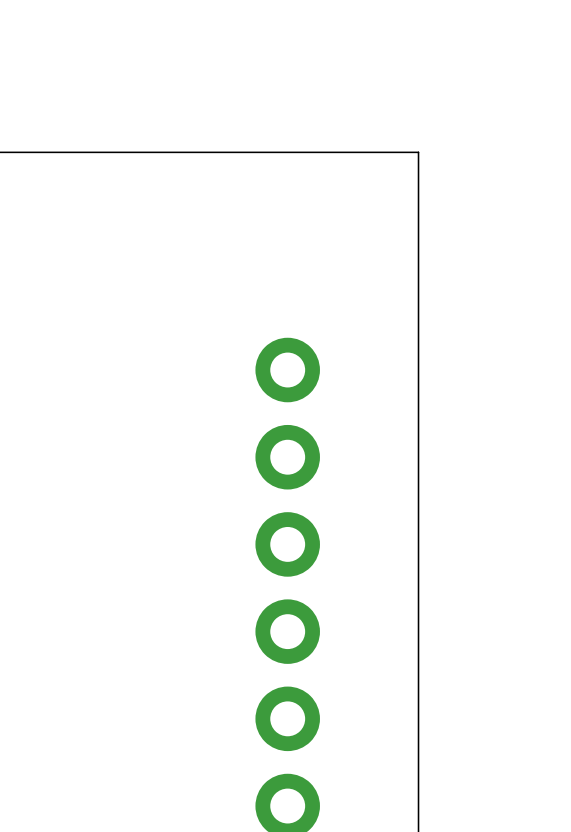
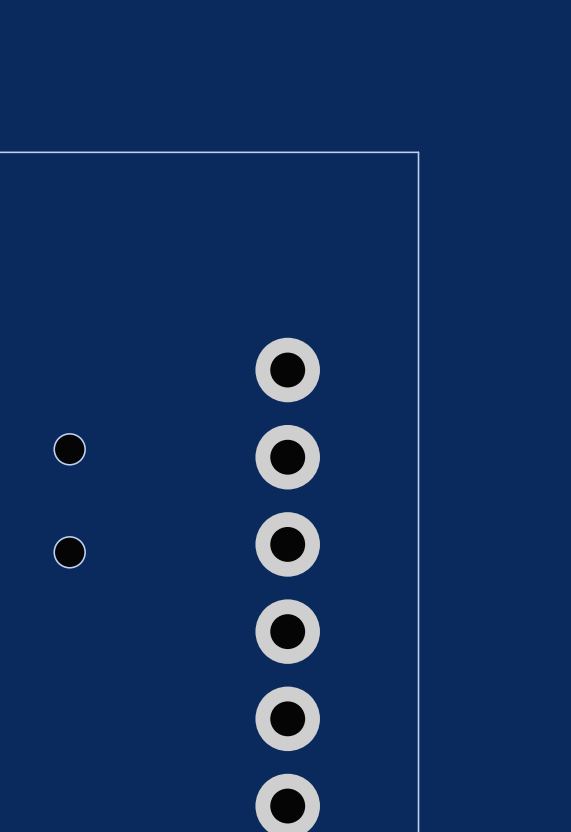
part: none -> (69, 500)

